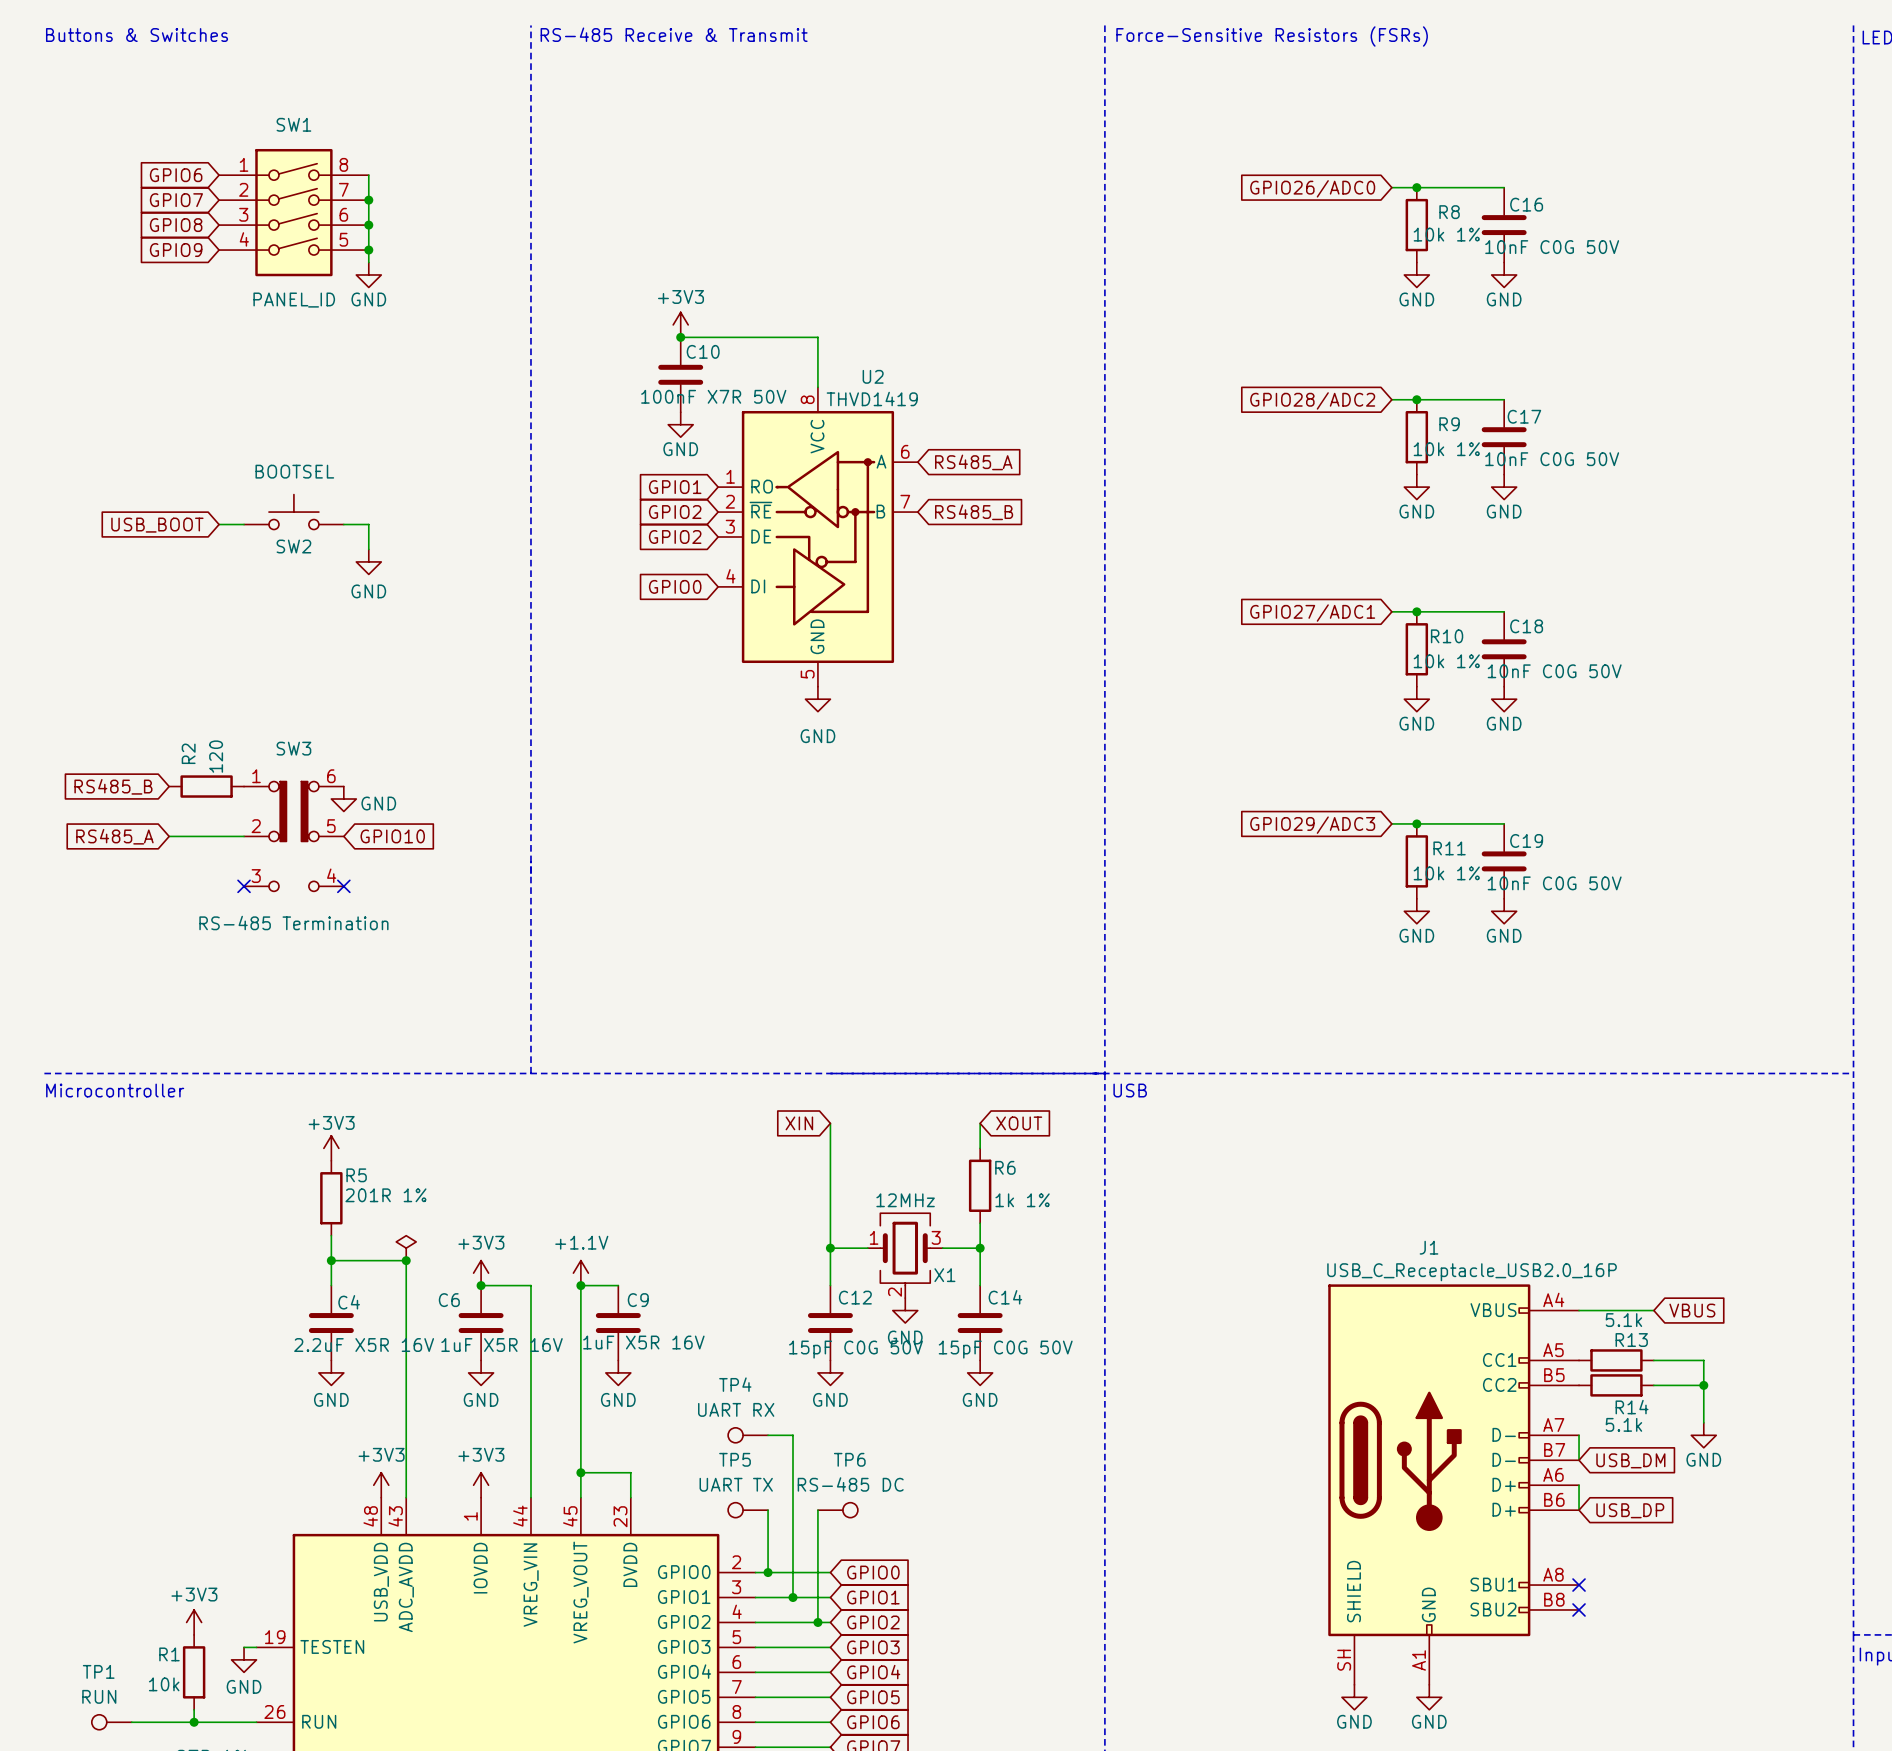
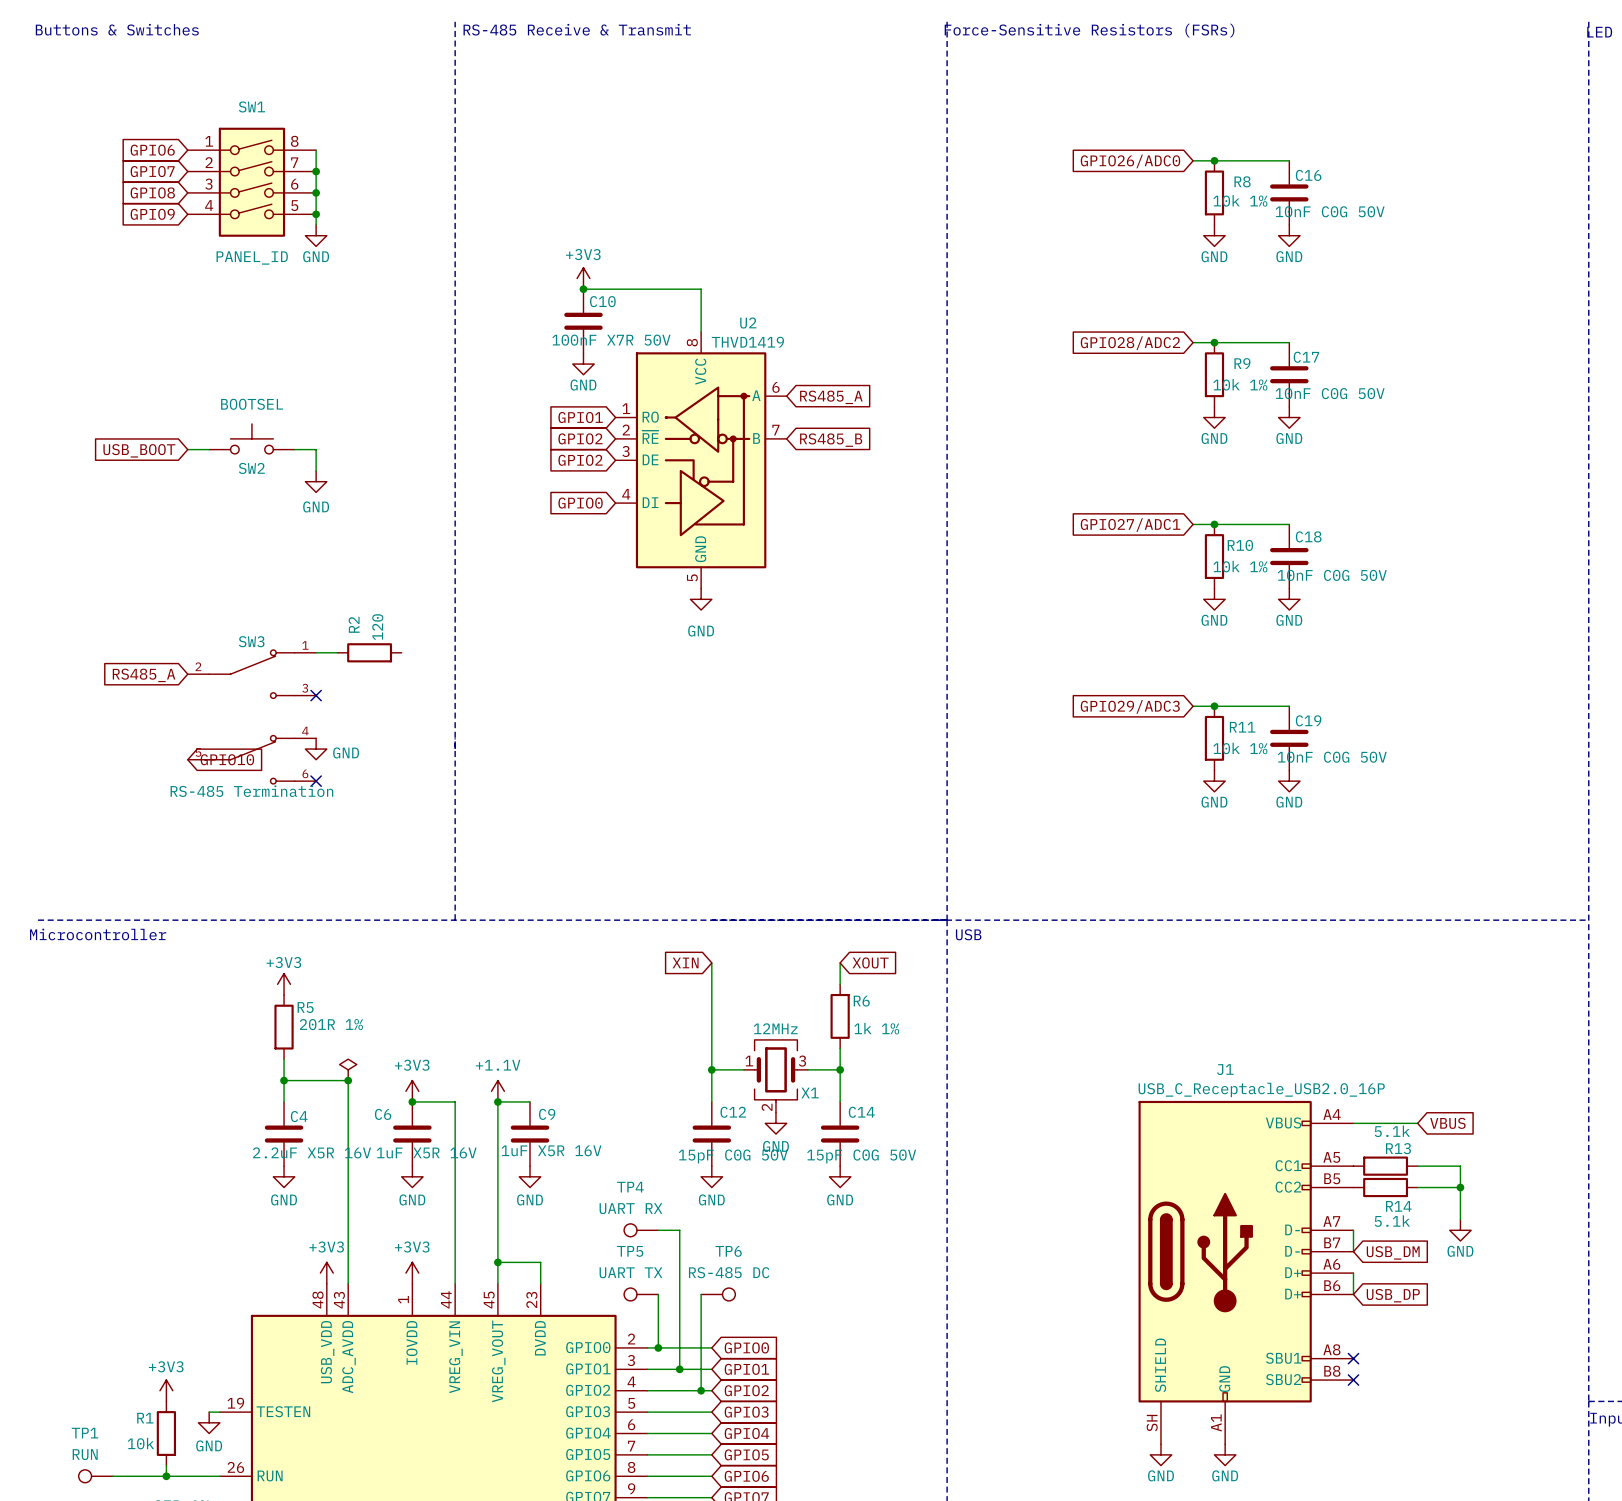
wire: none -> (316, 652) (337, 652)
SW3 symbol: [244, 781, 344, 892] -> [187, 649, 317, 785]
global label: RS485_B (113, 786) -> none
R2 position: (206, 786) -> (369, 652)
power symbol position: GND (343, 799) -> GND (316, 749)
no-connect mark: none -> (316, 695)
global label position: RS485_A (114, 836) -> RS485_A (144, 675)
wire: (169, 836) (244, 836) -> none
global label position: GPIO10 (392, 836) -> GPIO10 (227, 759)
no-connect mark: (244, 886) -> none
no-connect mark position: (343, 886) -> (316, 781)

